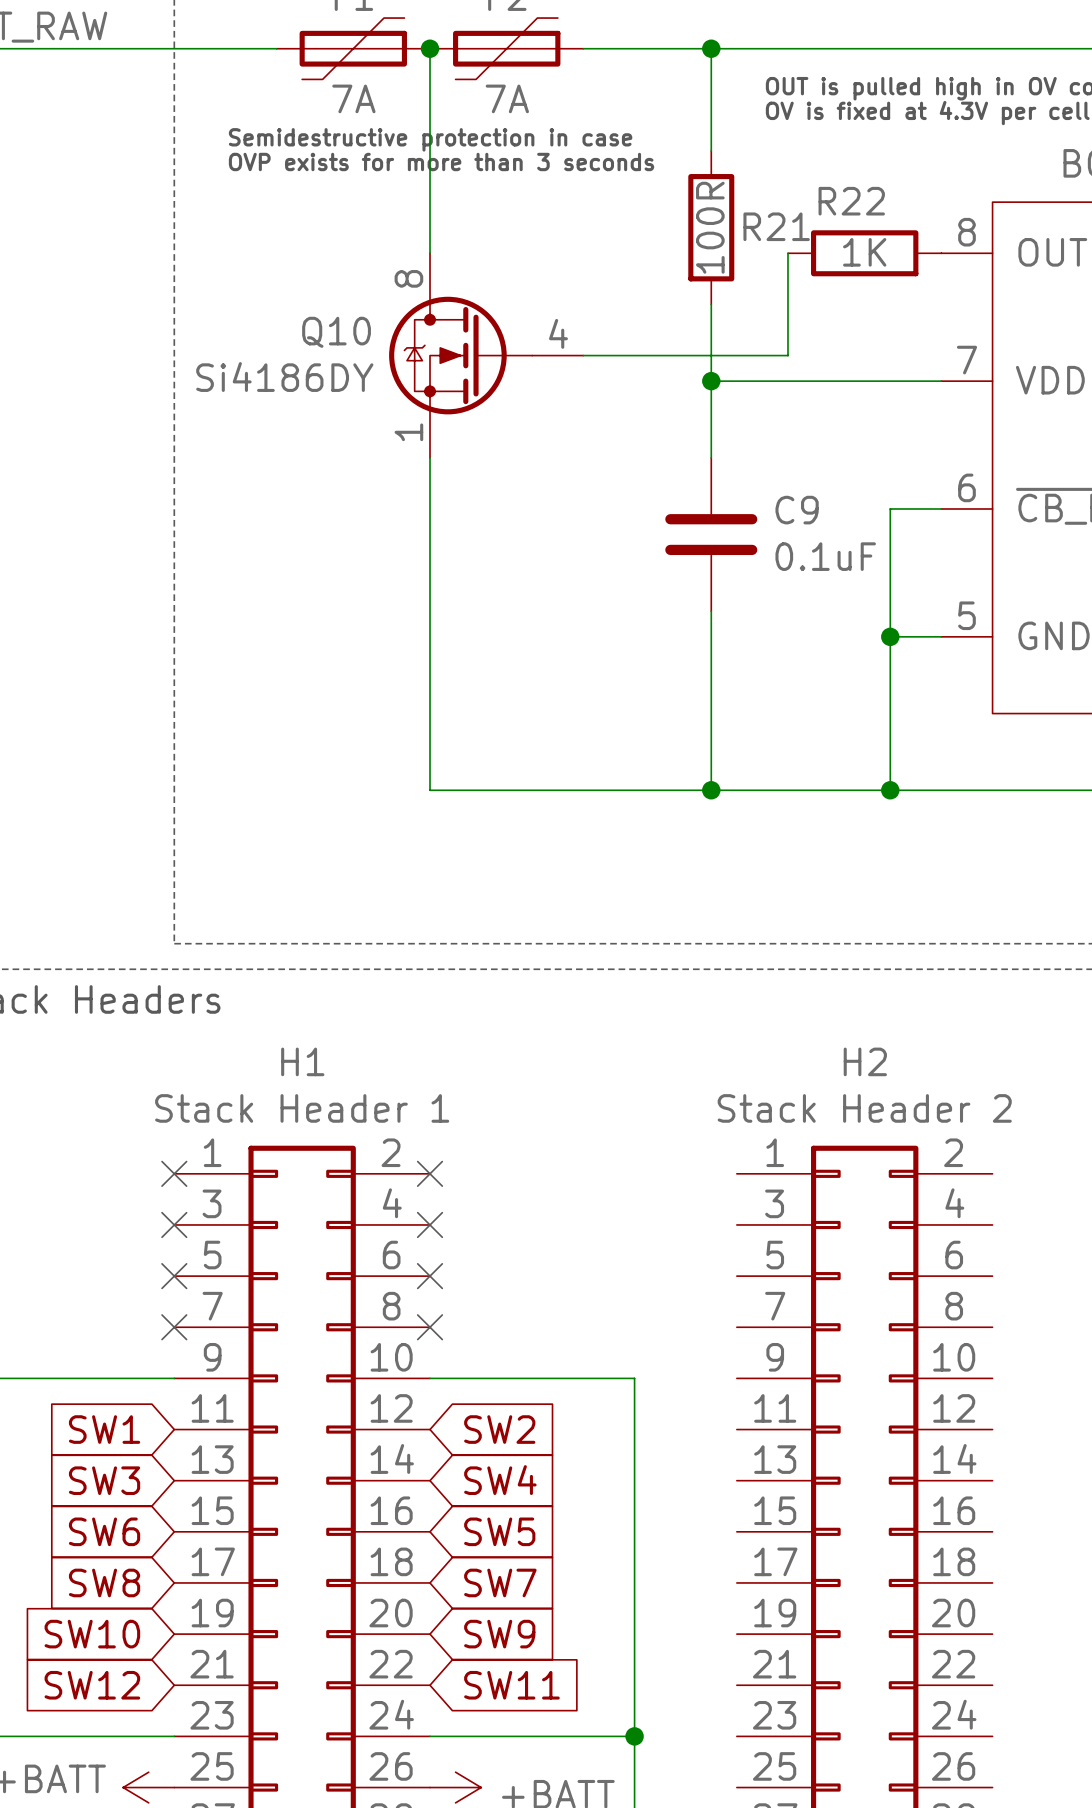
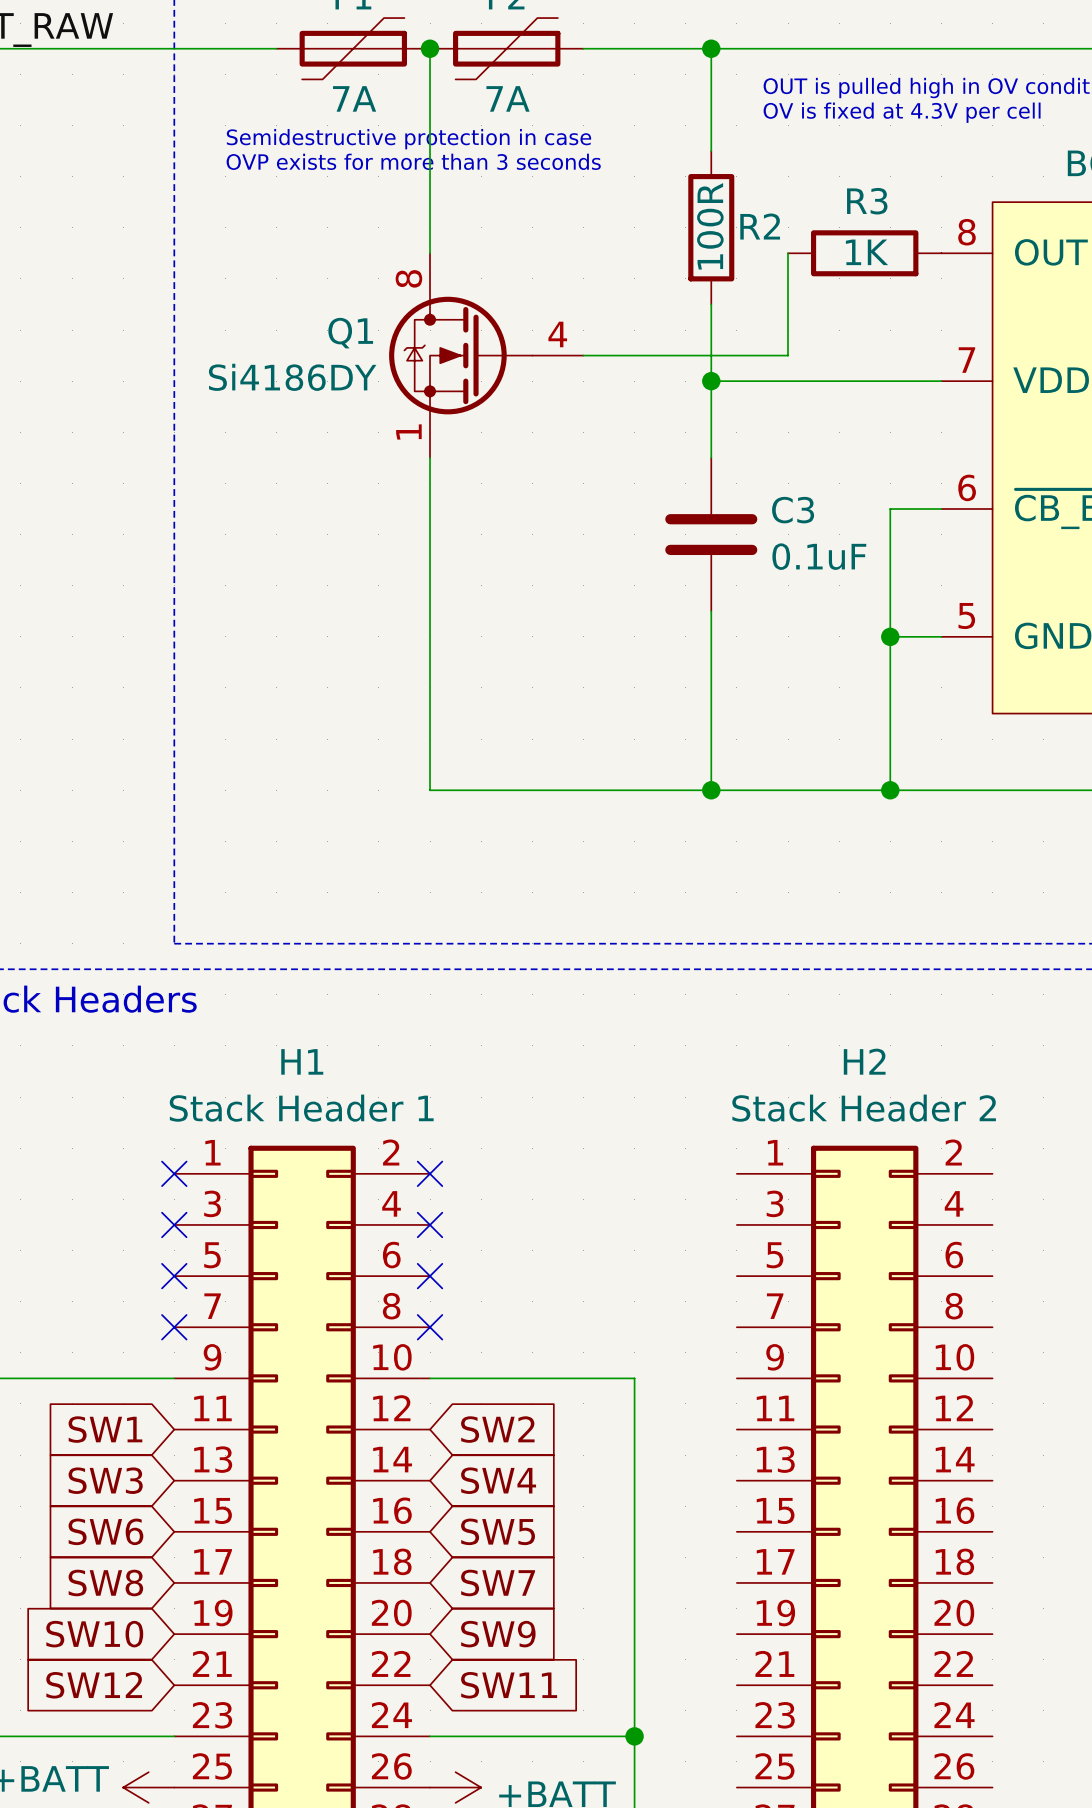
R22 name: R22 (851, 201) -> R3 (867, 201)
R21 name: R21 (776, 226) -> R2 (760, 226)
Q10 name: Q10 (336, 332) -> Q1 (350, 333)
C9 name: C9 (797, 510) -> C3 (793, 510)

